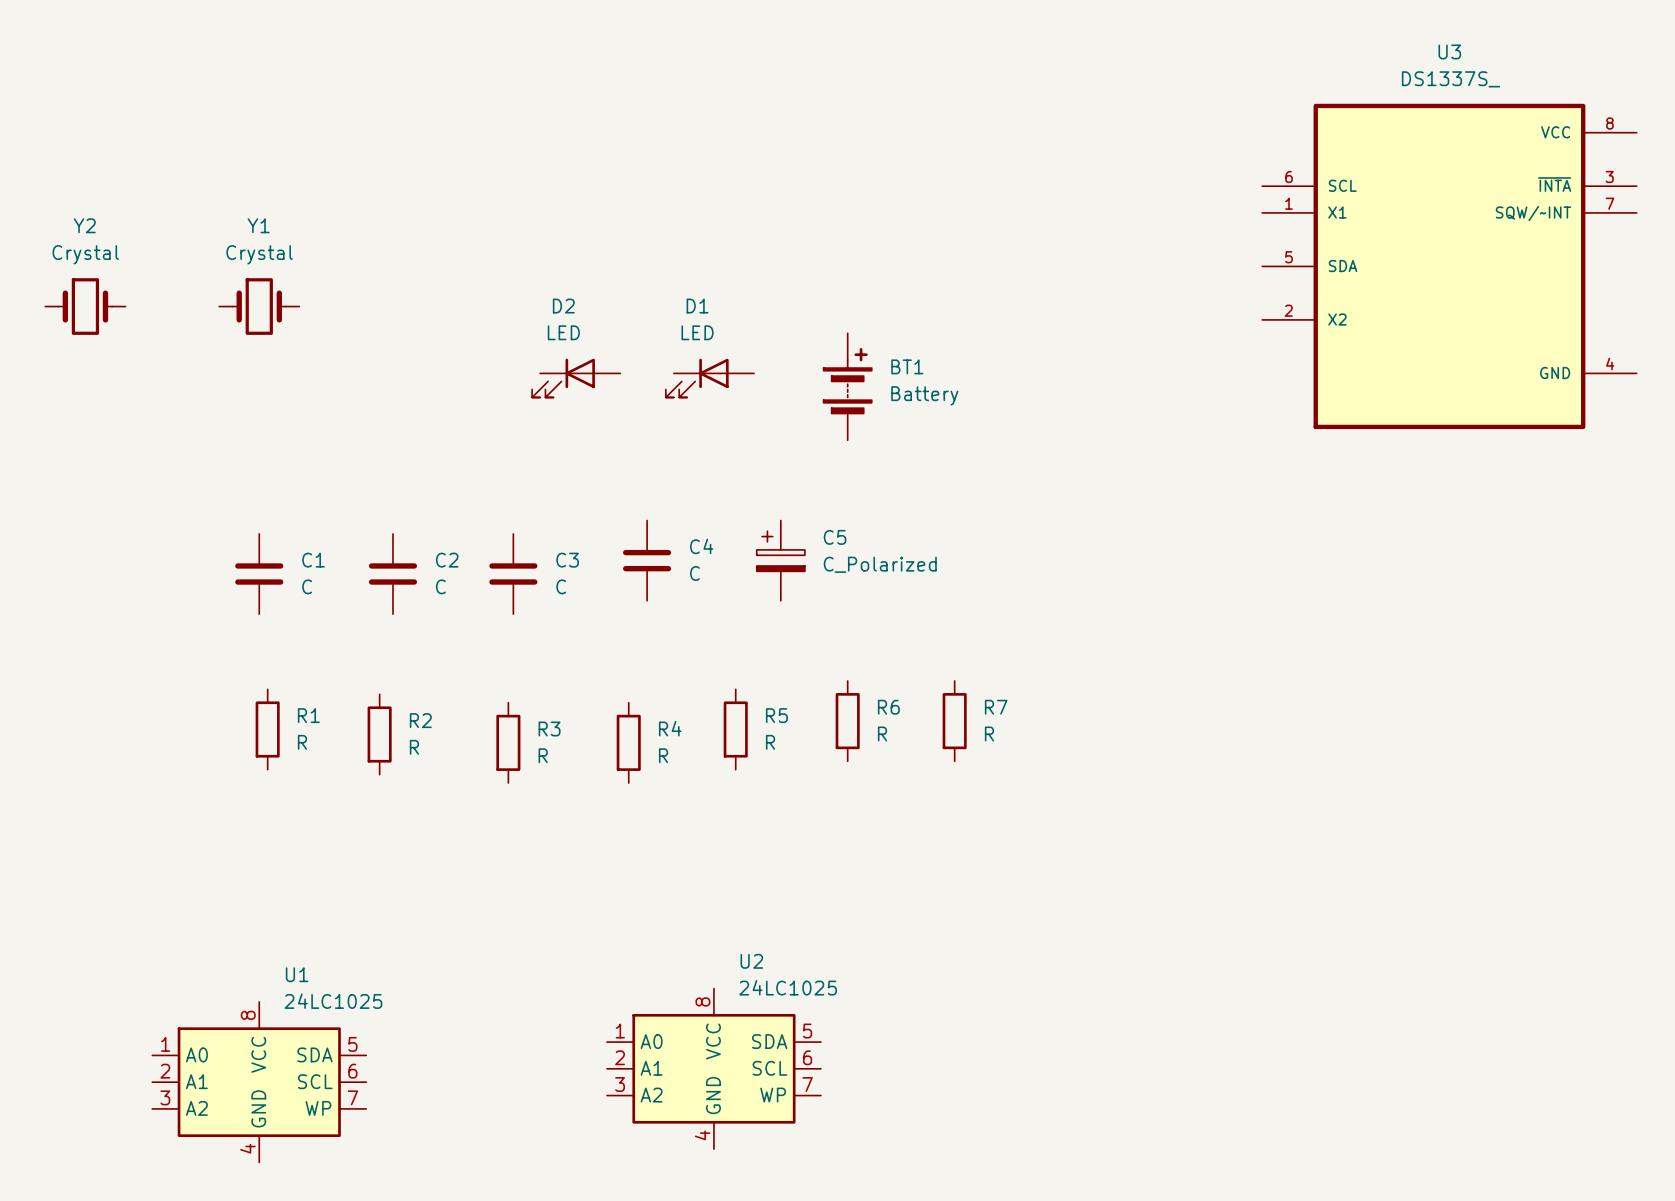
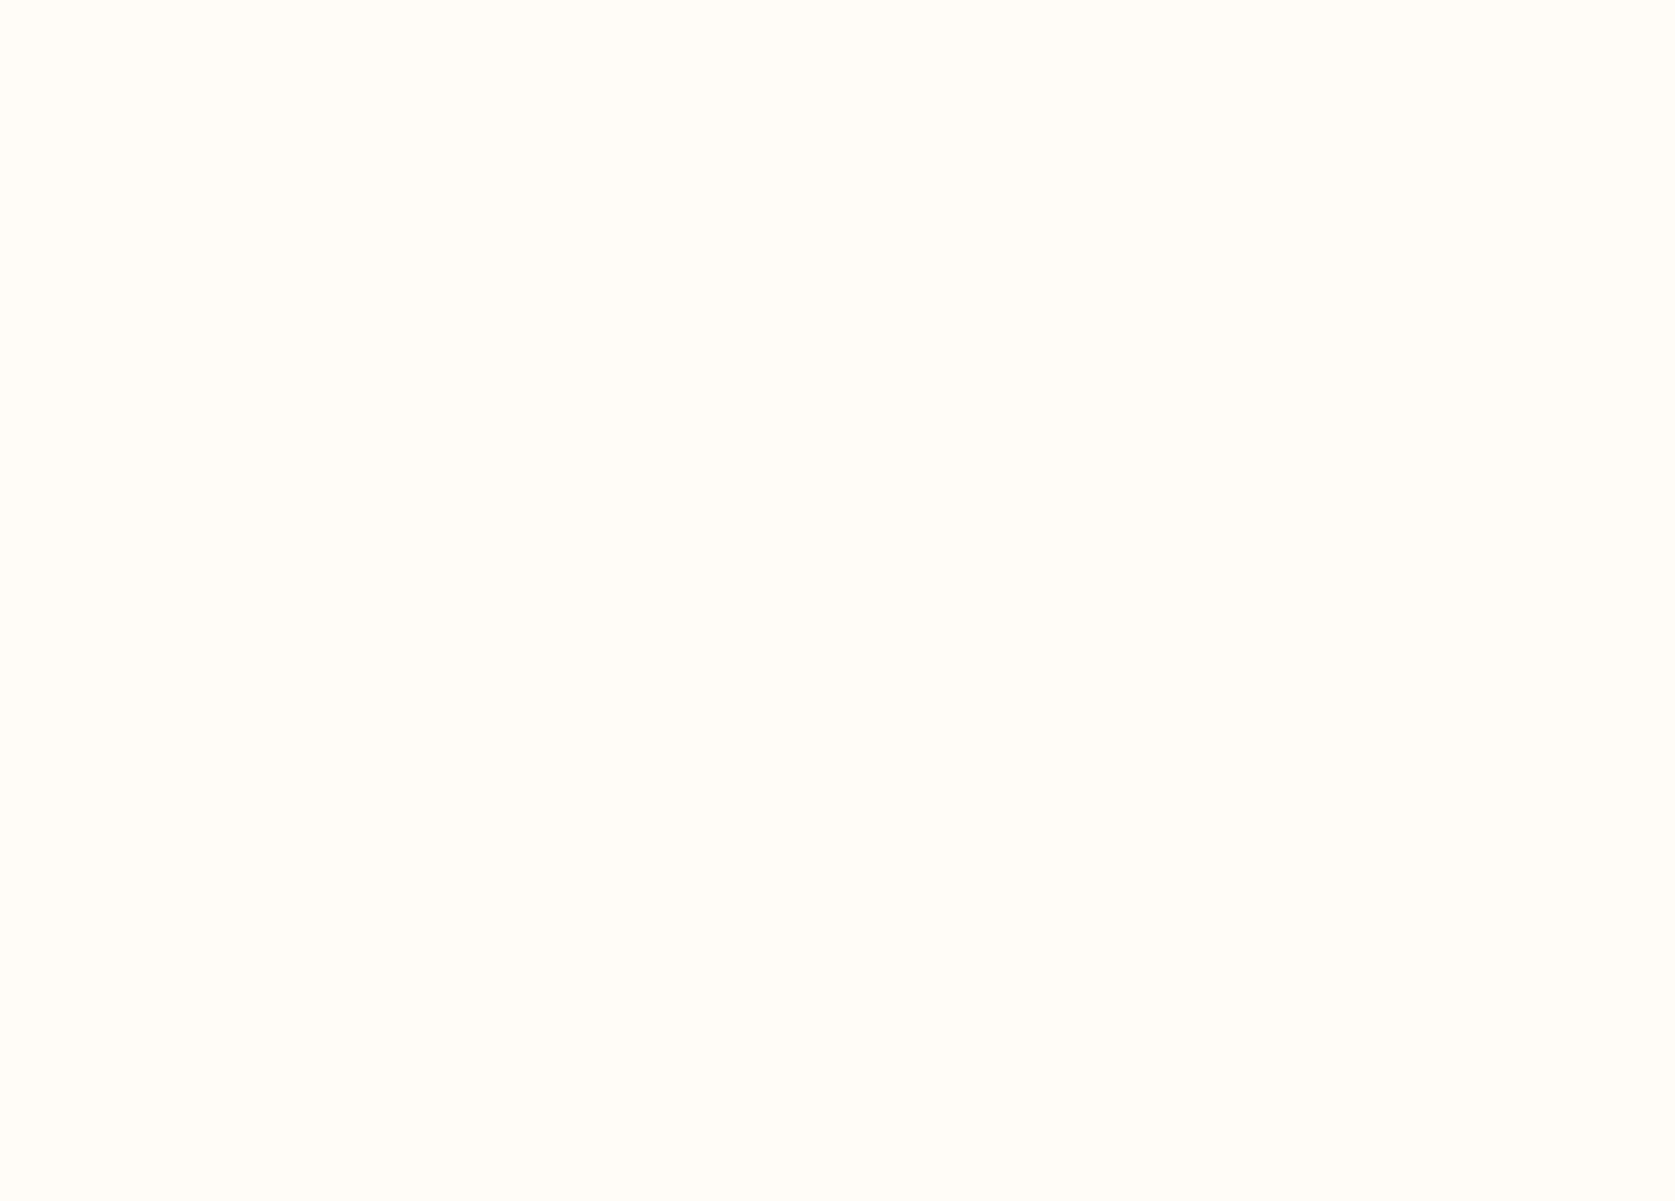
U3: DS1337S_ (1449, 266) -> none
Y2: Crystal (85, 306) -> none
Y1: Crystal (259, 306) -> none
D2: LED (576, 378) -> none
D1: LED (709, 378) -> none
BT1: Battery (847, 386) -> none
C4: C (647, 560) -> none
C5: C_Polarized (780, 560) -> none
C1: C (259, 574) -> none
C2: C (393, 574) -> none
C3: C (513, 574) -> none
R6: R (847, 721) -> none
R7: R (954, 721) -> none
R1: R (267, 729) -> none
R5: R (735, 729) -> none
R2: R (379, 734) -> none
R3: R (508, 742) -> none
R4: R (628, 742) -> none
U2: 24LC1025 (713, 1068) -> none
U1: 24LC1025 (259, 1082) -> none

